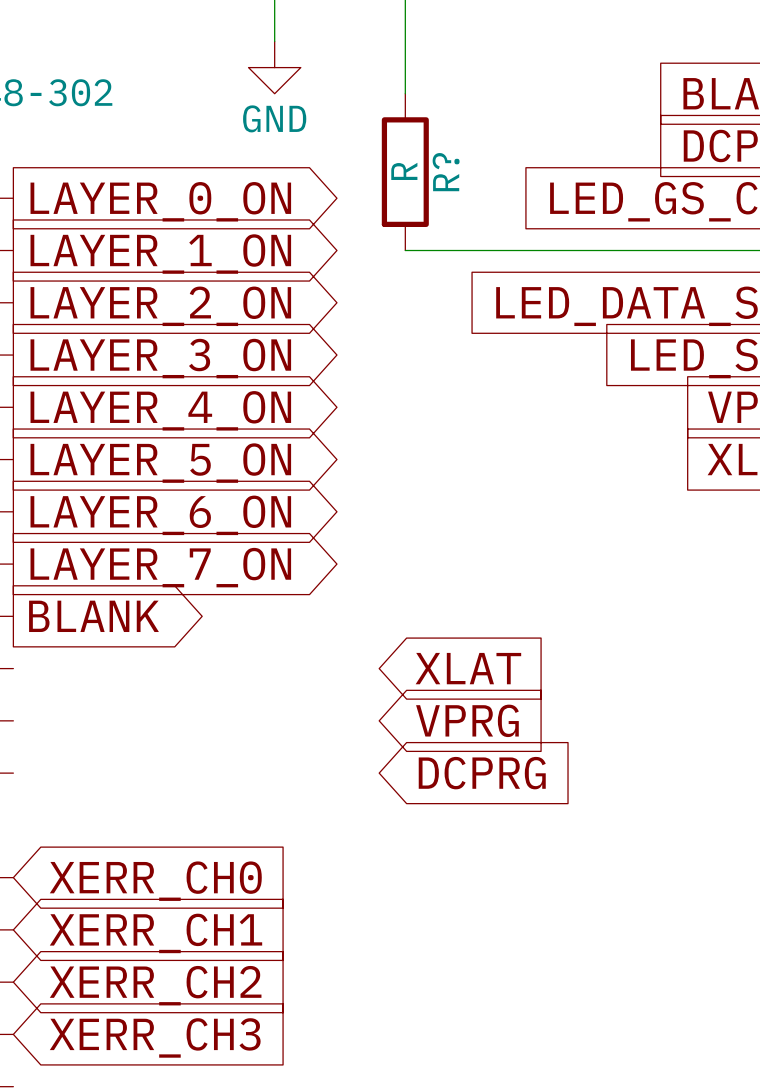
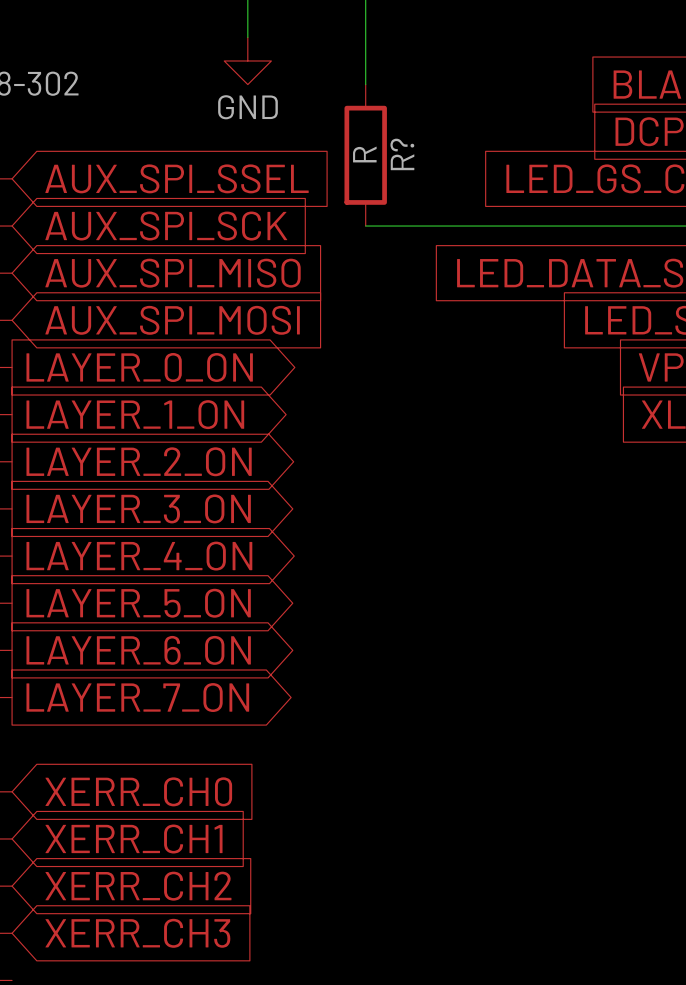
global label shape: output (160, 201) -> input (176, 178)
global label: LAYER_0_ON (160, 201) -> AUX_SPI_SSEL (176, 178)
global label shape: output (160, 254) -> input (166, 226)
global label: LAYER_1_ON (160, 254) -> AUX_SPI_SCK (166, 226)
global label shape: output (160, 306) -> input (172, 273)
global label: LAYER_2_ON (160, 306) -> AUX_SPI_MISO (172, 273)
global label shape: output (160, 358) -> input (172, 320)
global label: LAYER_3_ON (160, 358) -> AUX_SPI_MOSI (172, 320)
global label: LAYER_4_ON (160, 410) -> LAYER_0_ON (139, 367)
global label: LAYER_5_ON (160, 463) -> LAYER_1_ON (135, 414)
global label: LAYER_6_ON (160, 515) -> LAYER_2_ON (139, 461)
global label: LAYER_7_ON (160, 567) -> LAYER_3_ON (138, 508)
global label: BLANK (94, 616) -> LAYER_4_ON (139, 556)
global label: XLAT (468, 668) -> none
global label: none -> LAYER_5_ON (138, 603)
global label: VPRG (467, 720) -> none
global label: none -> LAYER_6_ON (138, 650)
global label: DCPRG (482, 773) -> none
global label: none -> LAYER_7_ON (137, 697)

